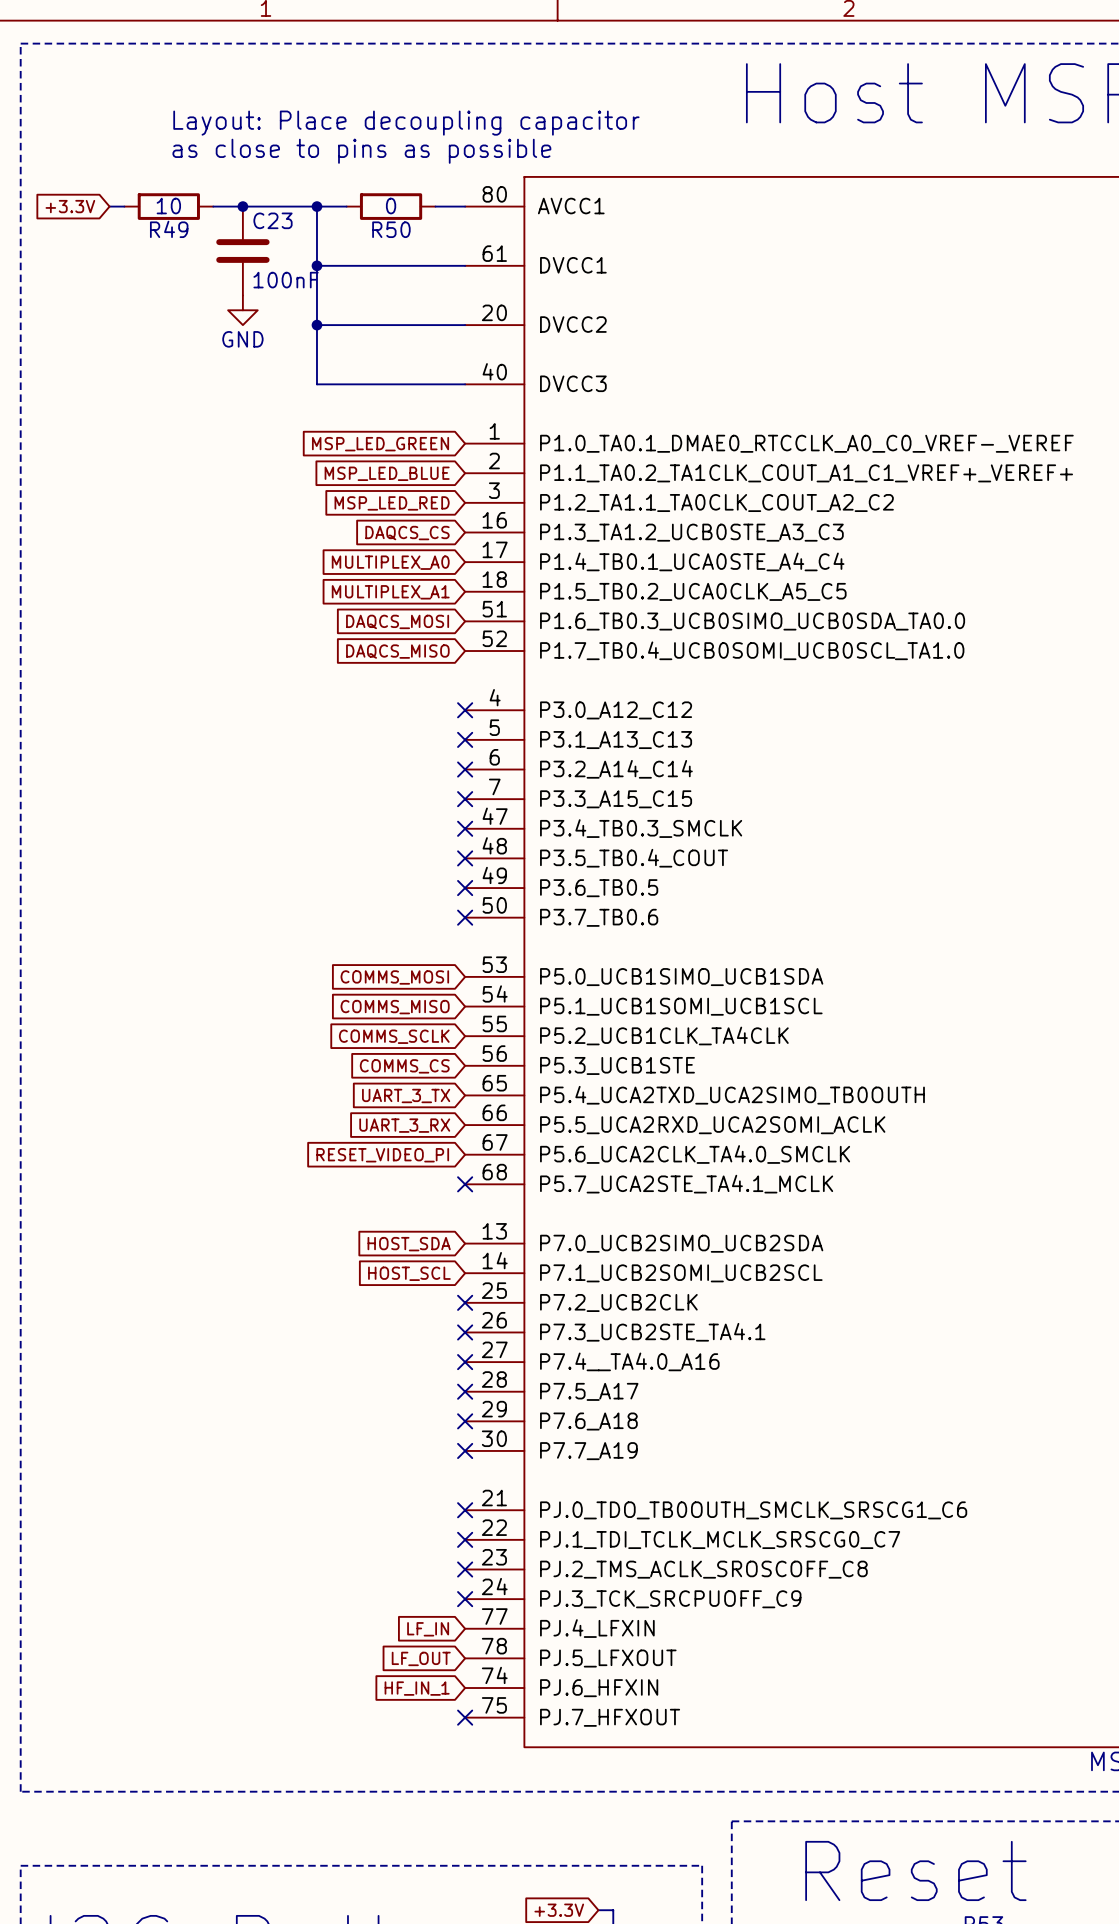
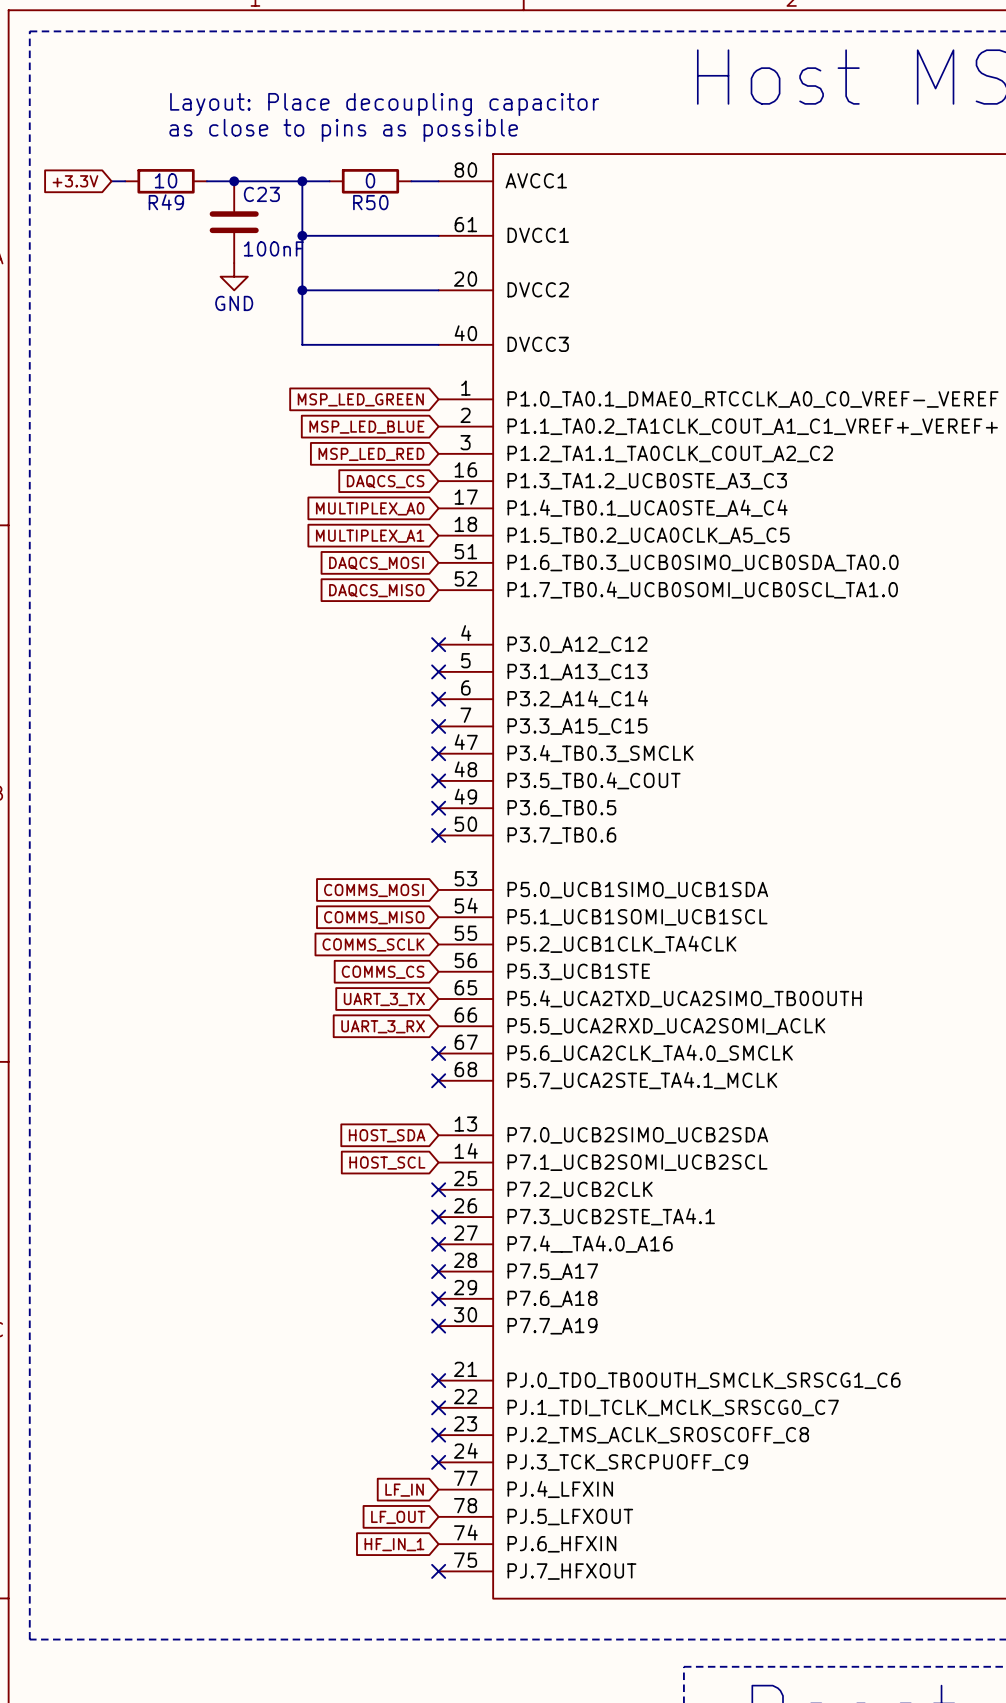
no-connect mark: none -> (438, 1053)
global label: RESET_VIDEO_PI (382, 1155) -> none

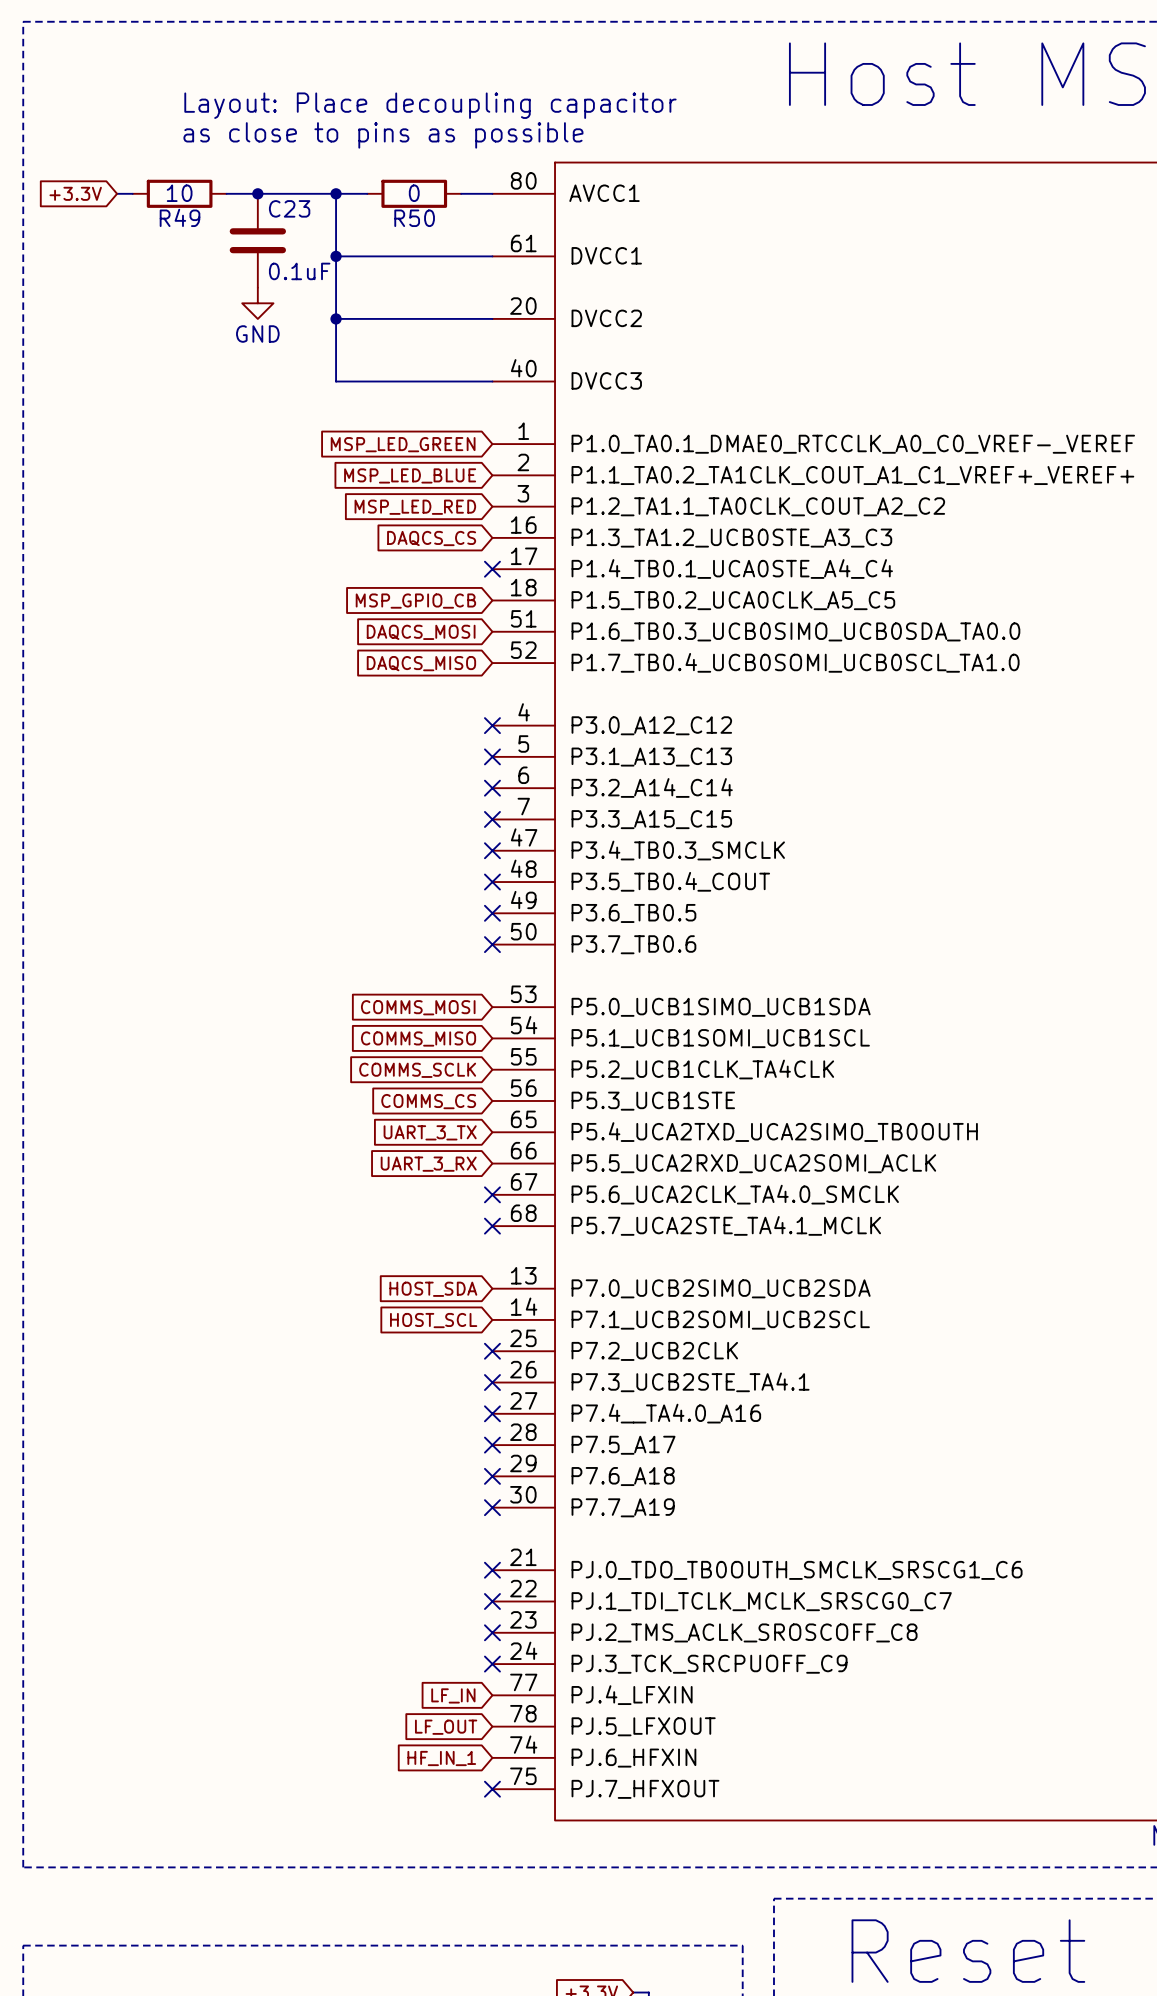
C23 value: 100nF (273, 248) -> 0.1uF (299, 271)
global label: MULTIPLEX_A0 (370, 508) -> none
no-connect mark: none -> (492, 569)
global label: MULTIPLEX_A1 (370, 536) -> MSP_GPIO_CB (415, 601)

